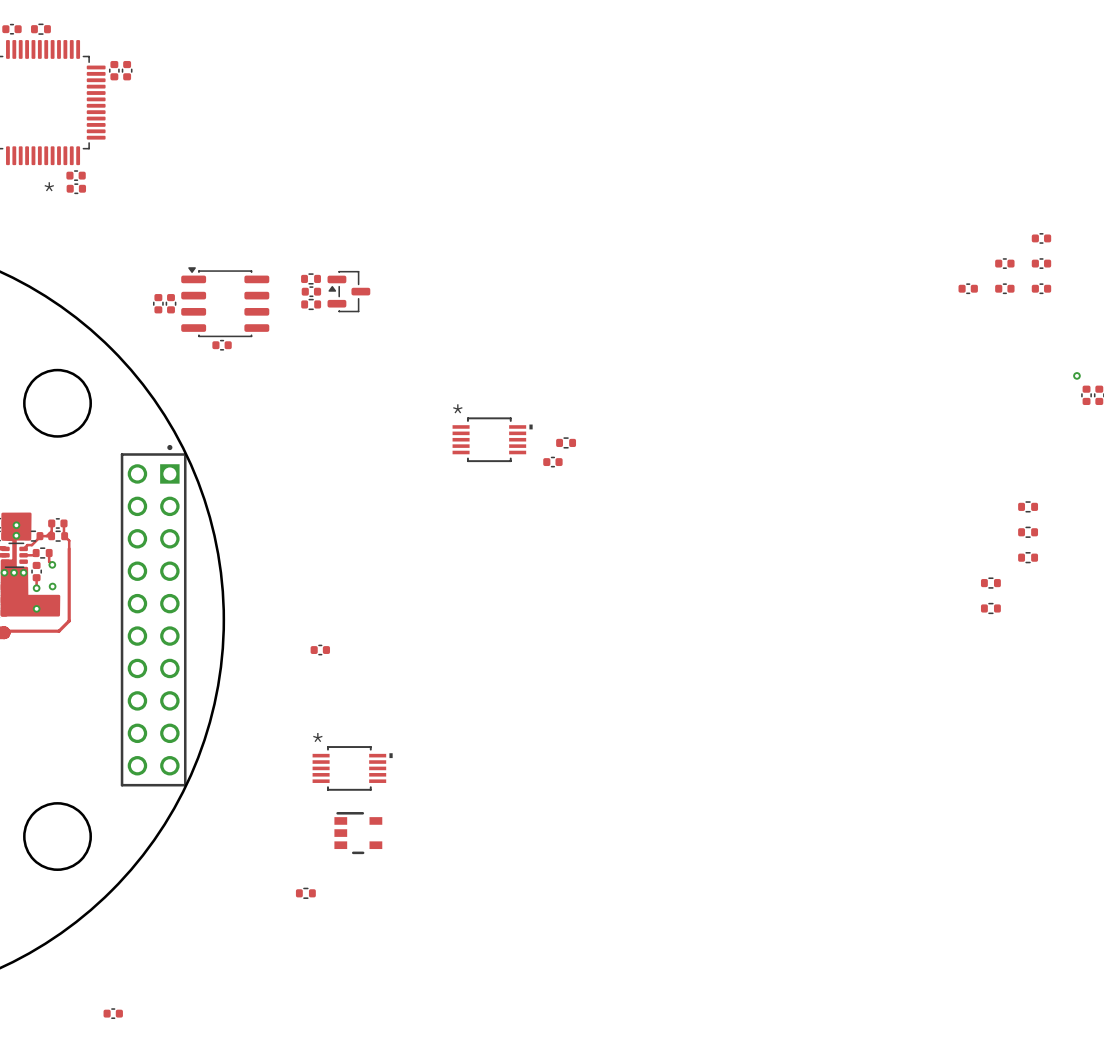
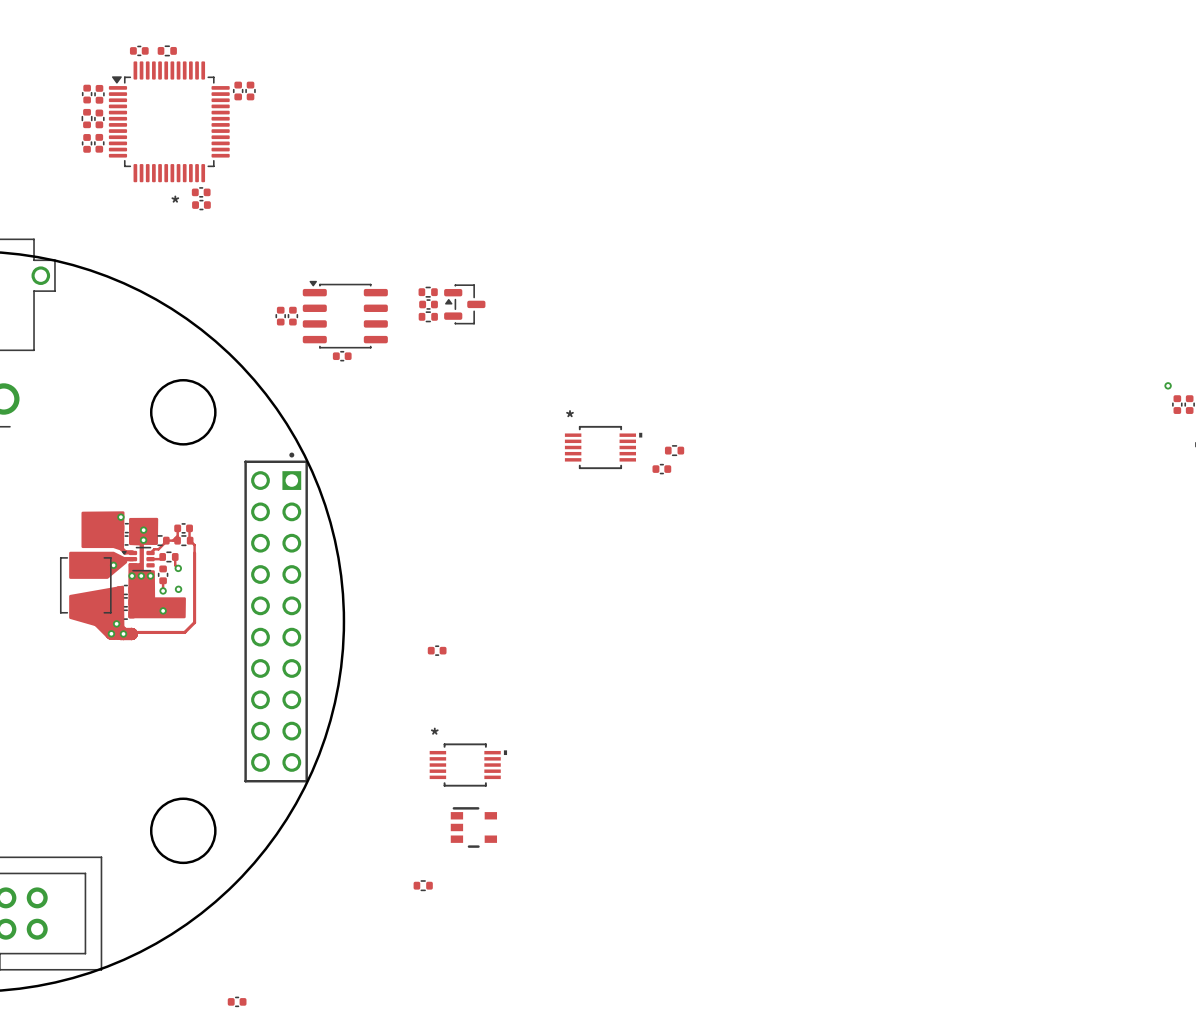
part: (1041, 238) -> none
part: (1004, 263) -> none
part: (1041, 263) -> none
part: (968, 288) -> none
part: (1004, 288) -> none
part: (1041, 288) -> none
part: (1028, 506) -> none
part: (1028, 532) -> none
part: (1028, 557) -> none
part: (990, 583) -> none
part: (990, 608) -> none

